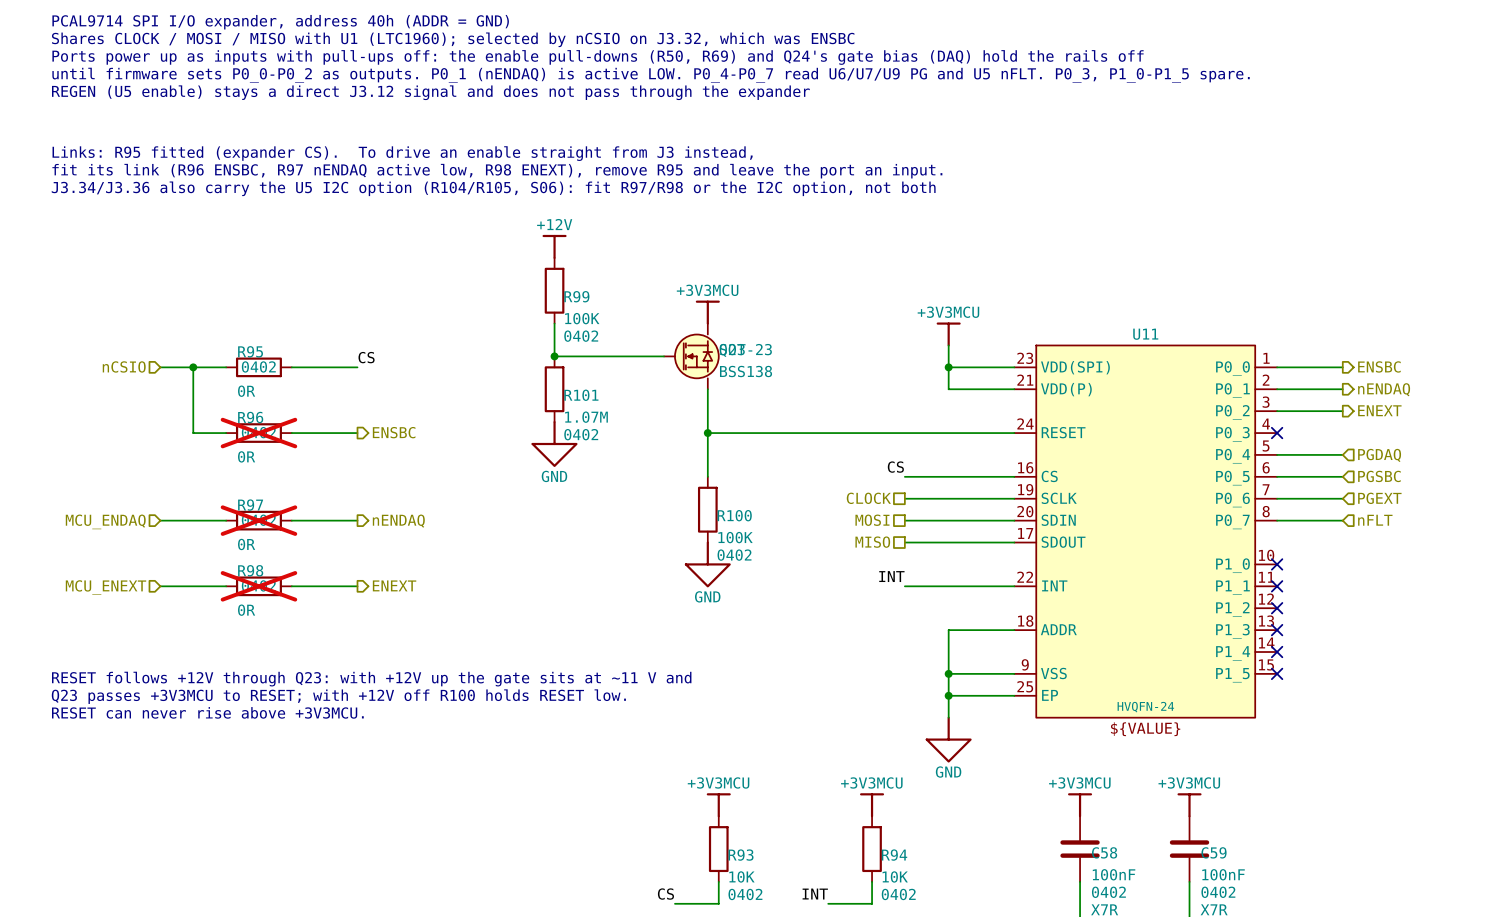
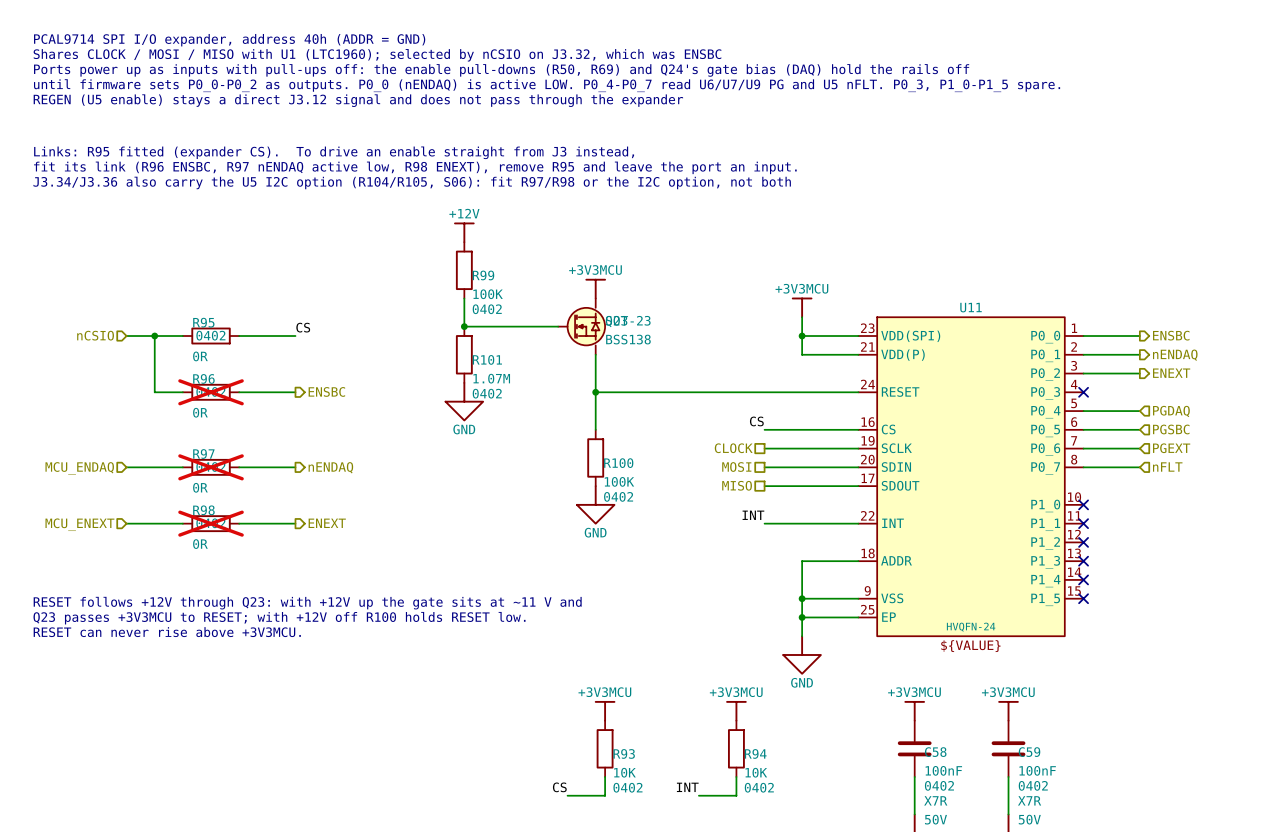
text: until firmware sets P0_0-P0_2 as outputs. P0_1 (nENDAQ) is active LOW. P0_4-P0_7 read U6/U7/U9 PG and U5 nFLT. P0_3, P1_0-P1_5 spare. (651, 75) -> until firmware sets P0_0-P0_2 as outputs. P0_0 (nENDAQ) is active LOW. P0_4-P0_7 read U6/U7/U9 PG and U5 nFLT. P0_3, P1_0-P1_5 spare. (547, 85)

